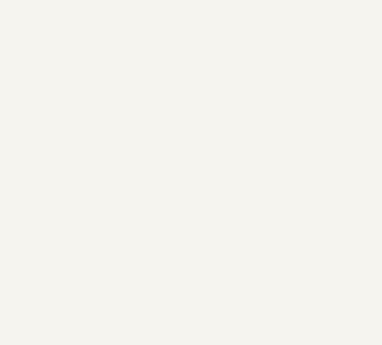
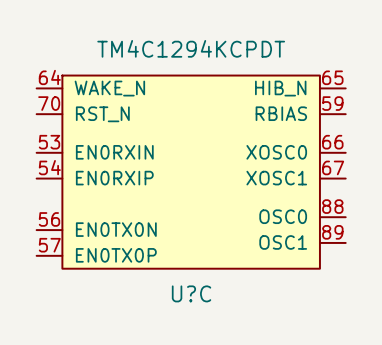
U?C: none -> TM4C1294KCPDT (191, 172)

